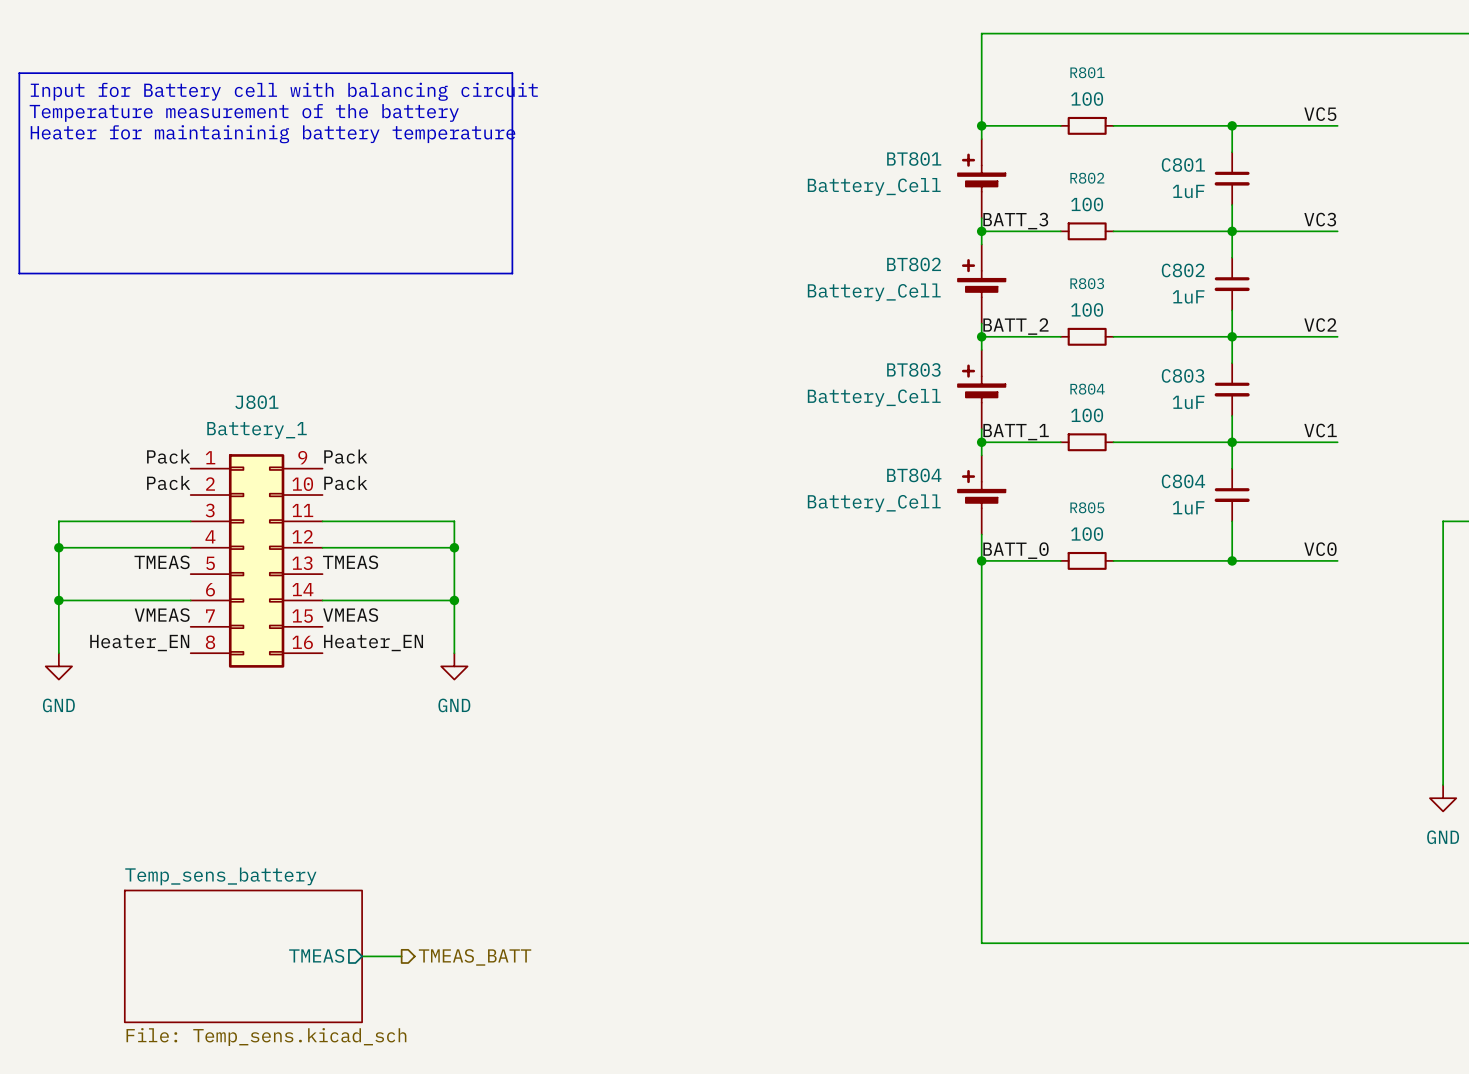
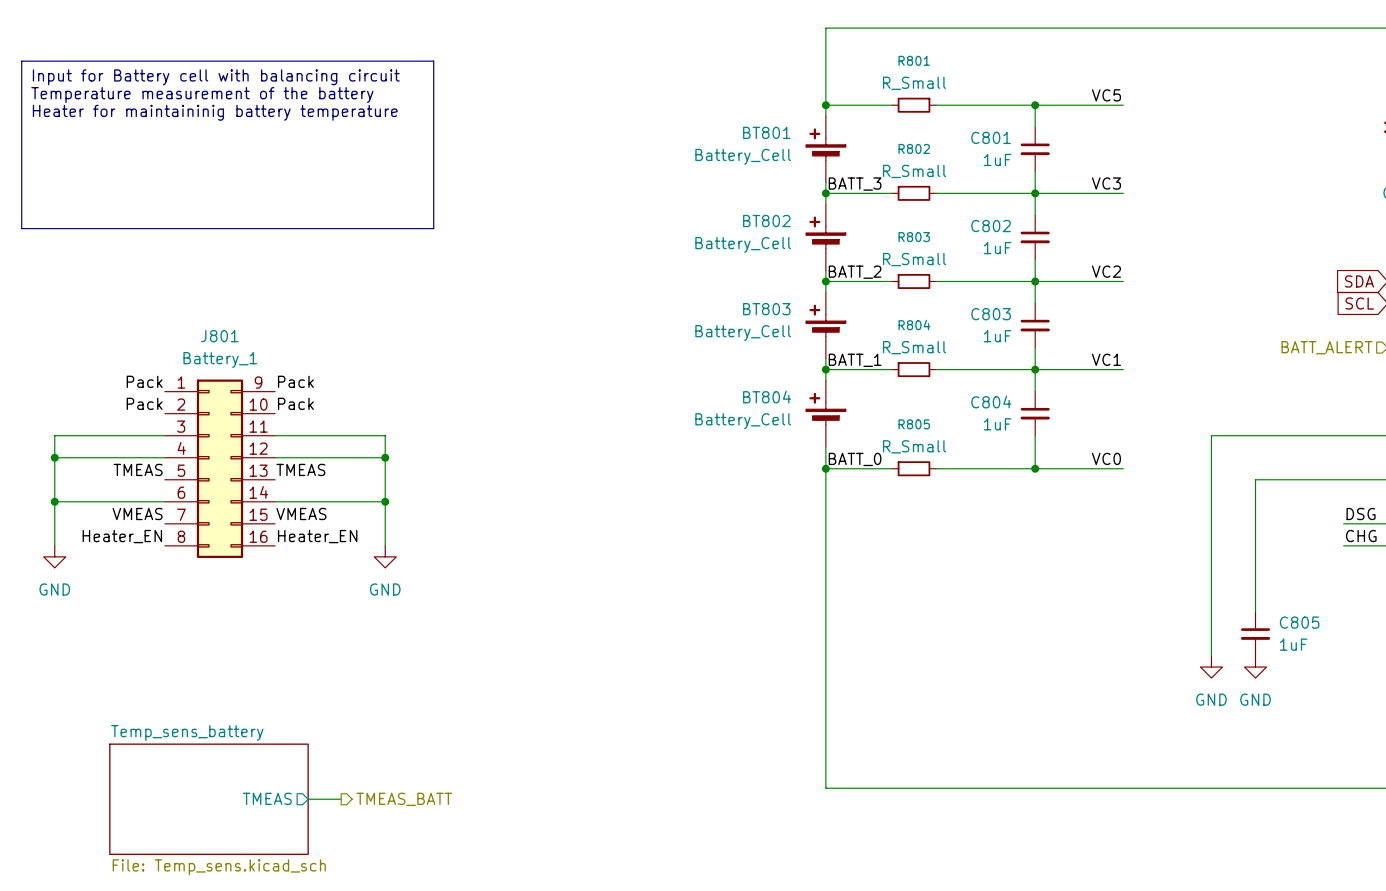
R801 value: 100 (1087, 99) -> R_Small (914, 83)
R802 value: 100 (1087, 204) -> R_Small (914, 171)
R803 value: 100 (1087, 309) -> R_Small (914, 259)
R804 value: 100 (1087, 415) -> R_Small (914, 347)
R805 value: 100 (1087, 534) -> R_Small (914, 446)

